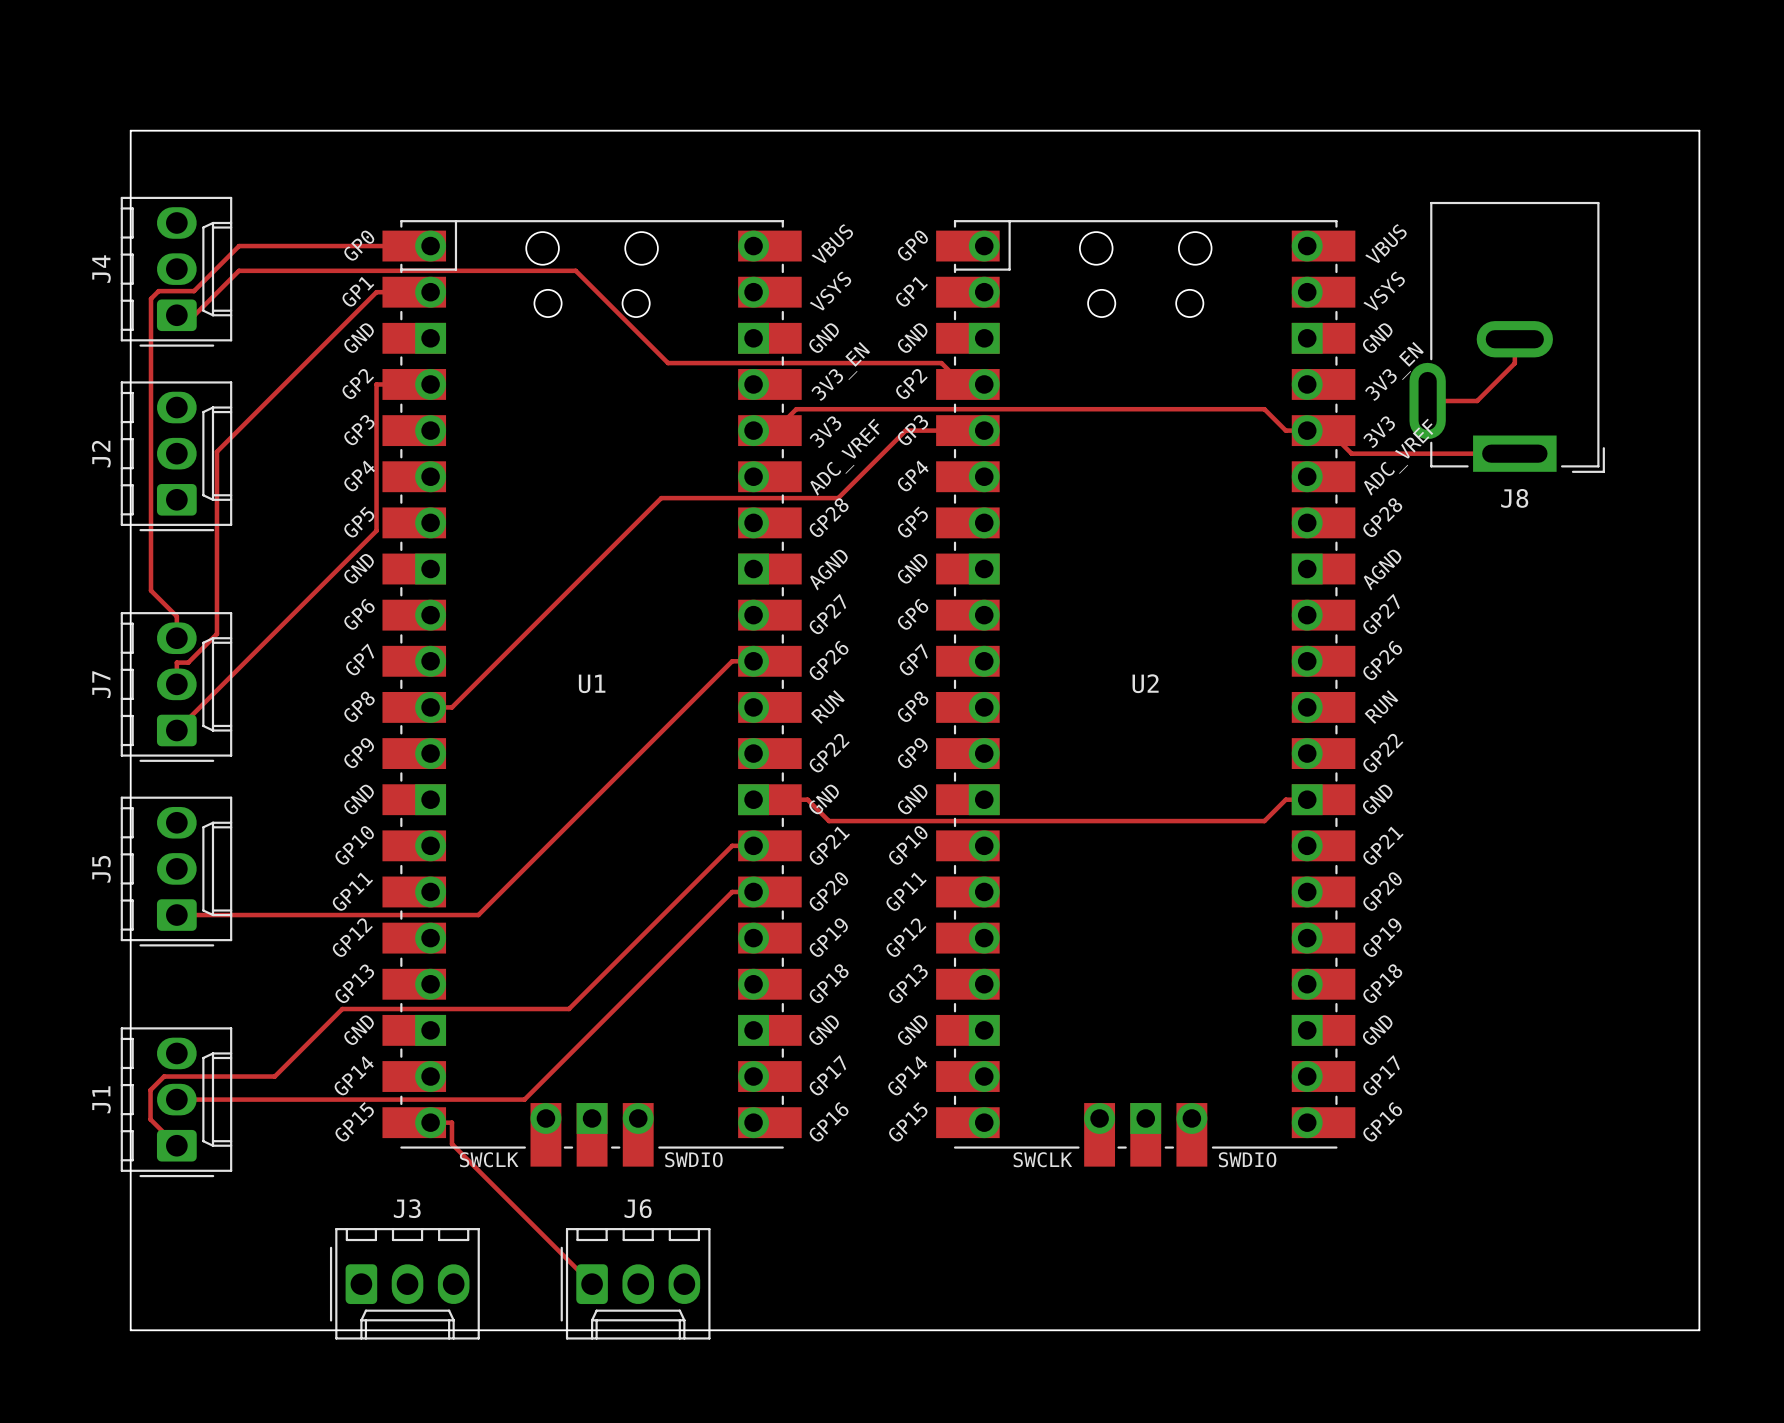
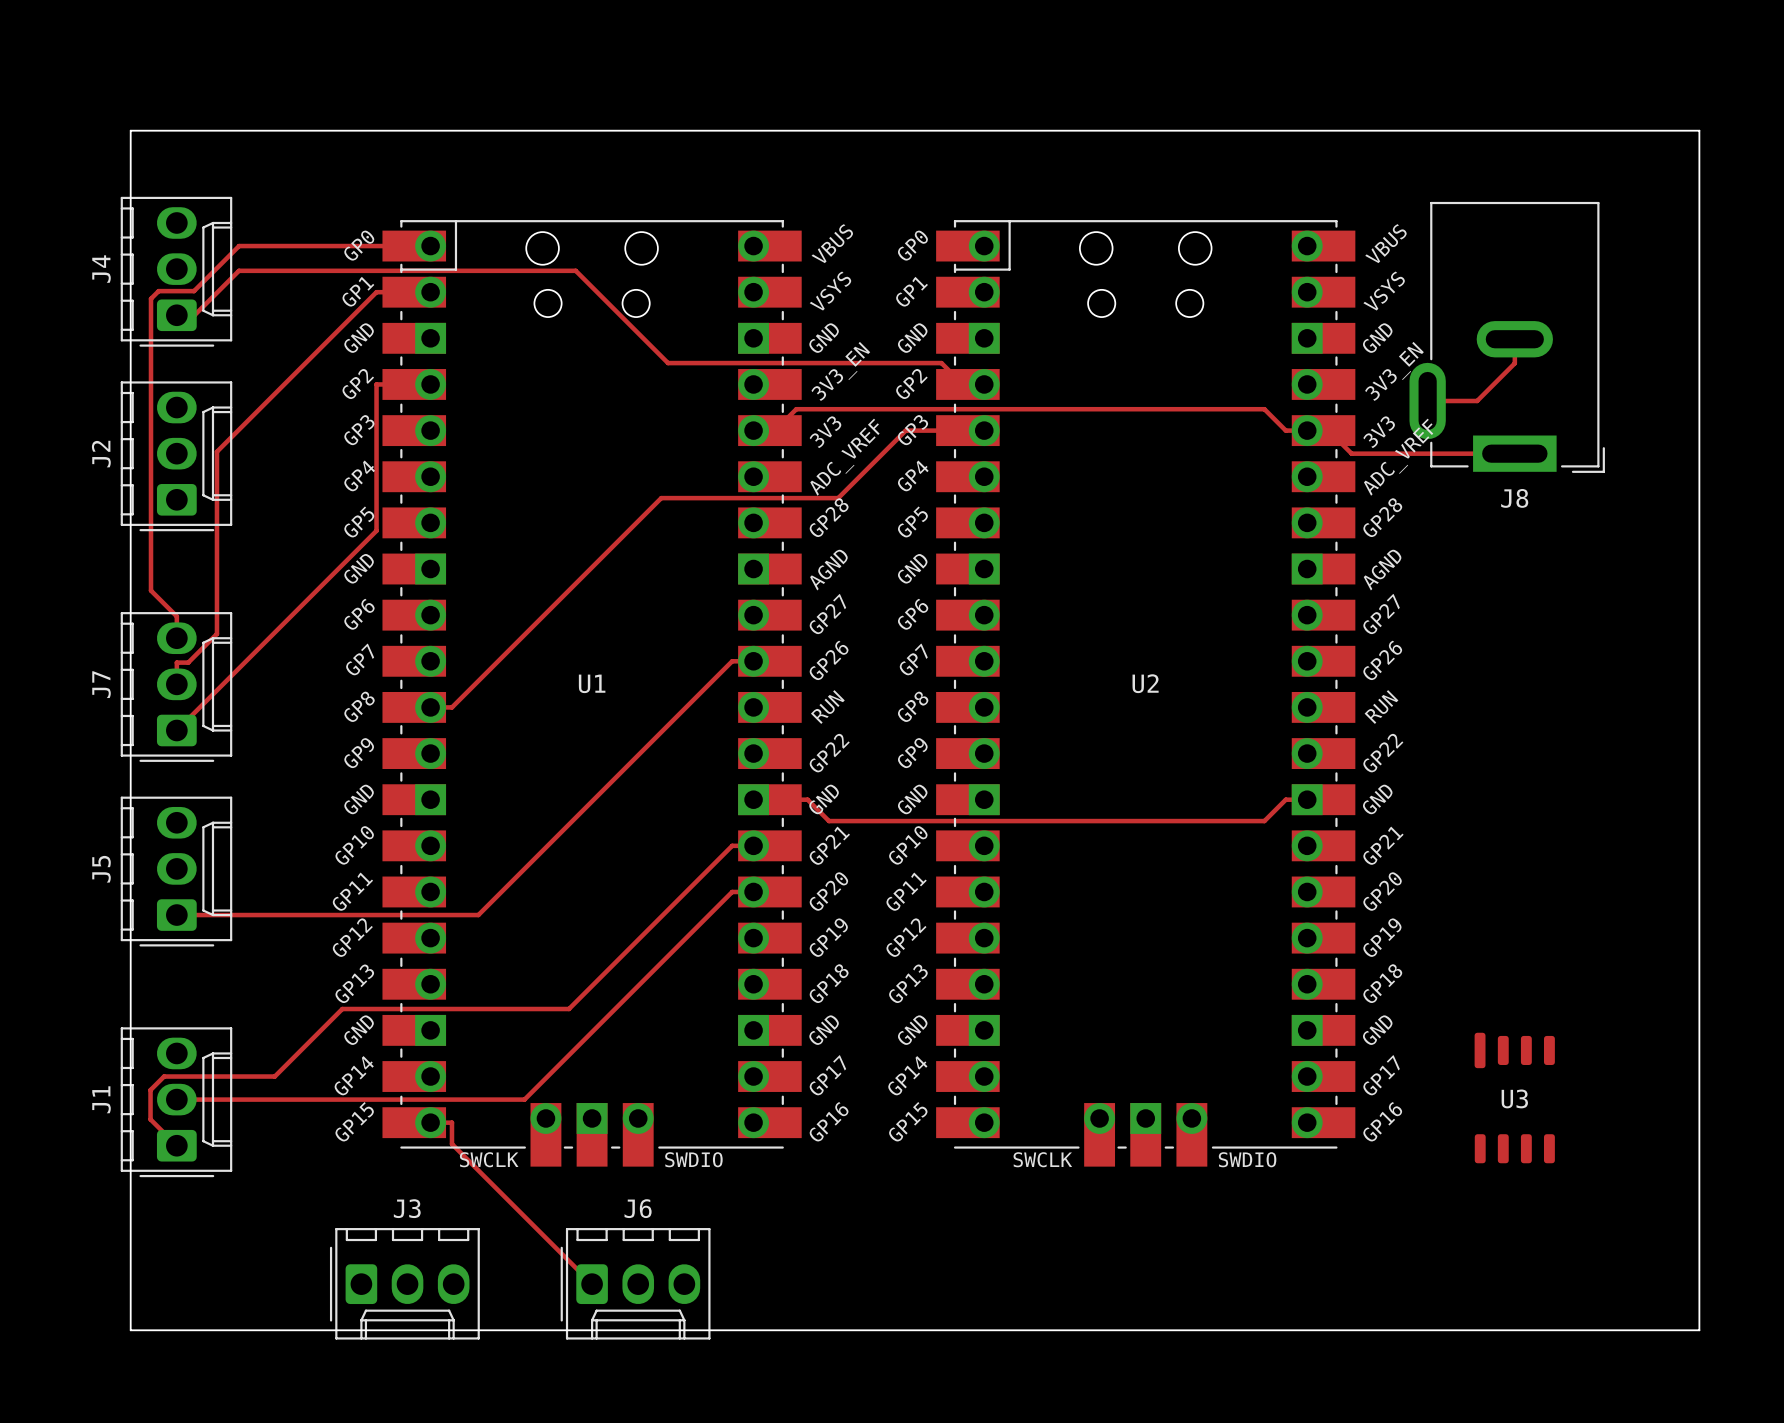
U3: none -> (1514, 1098)

